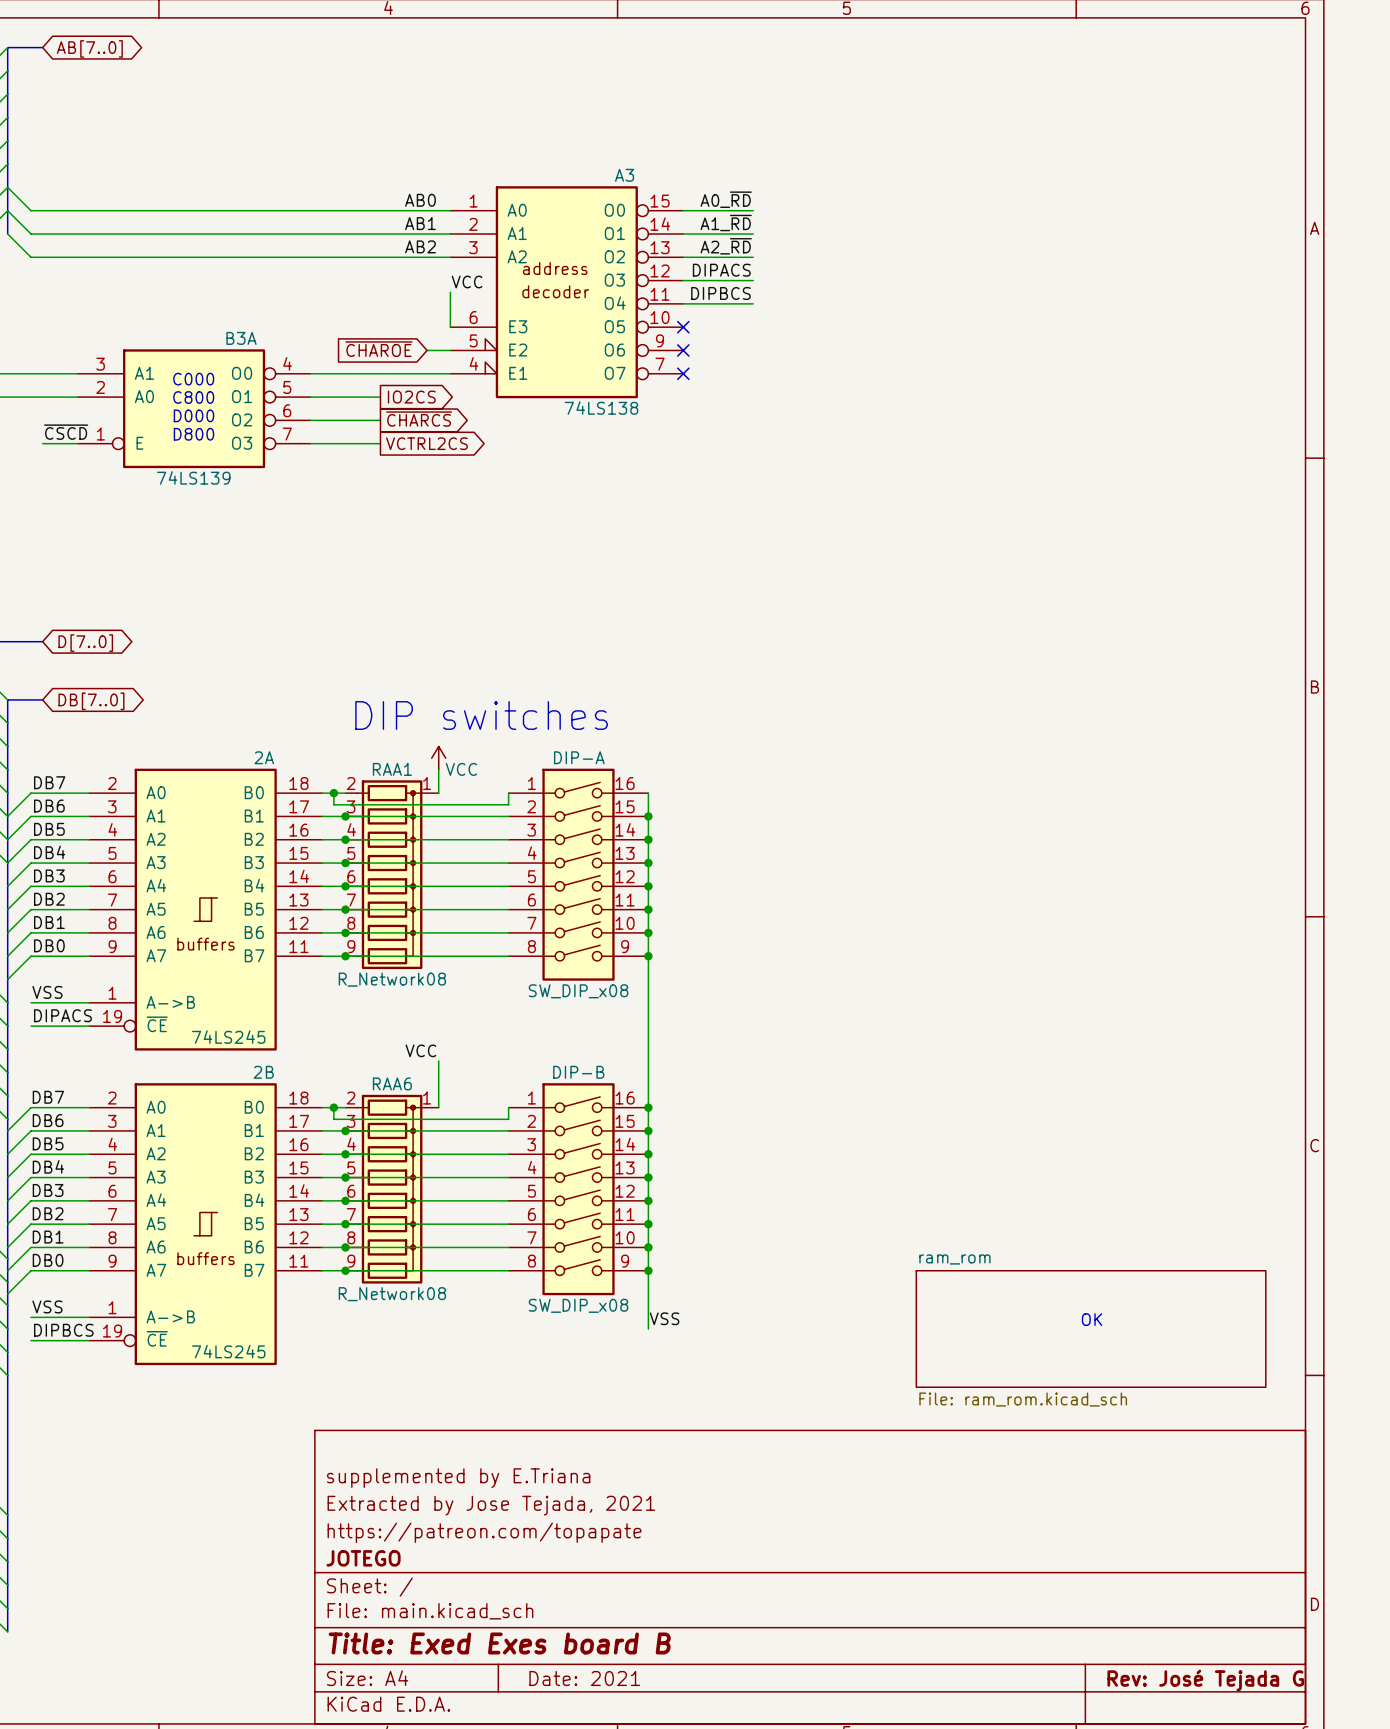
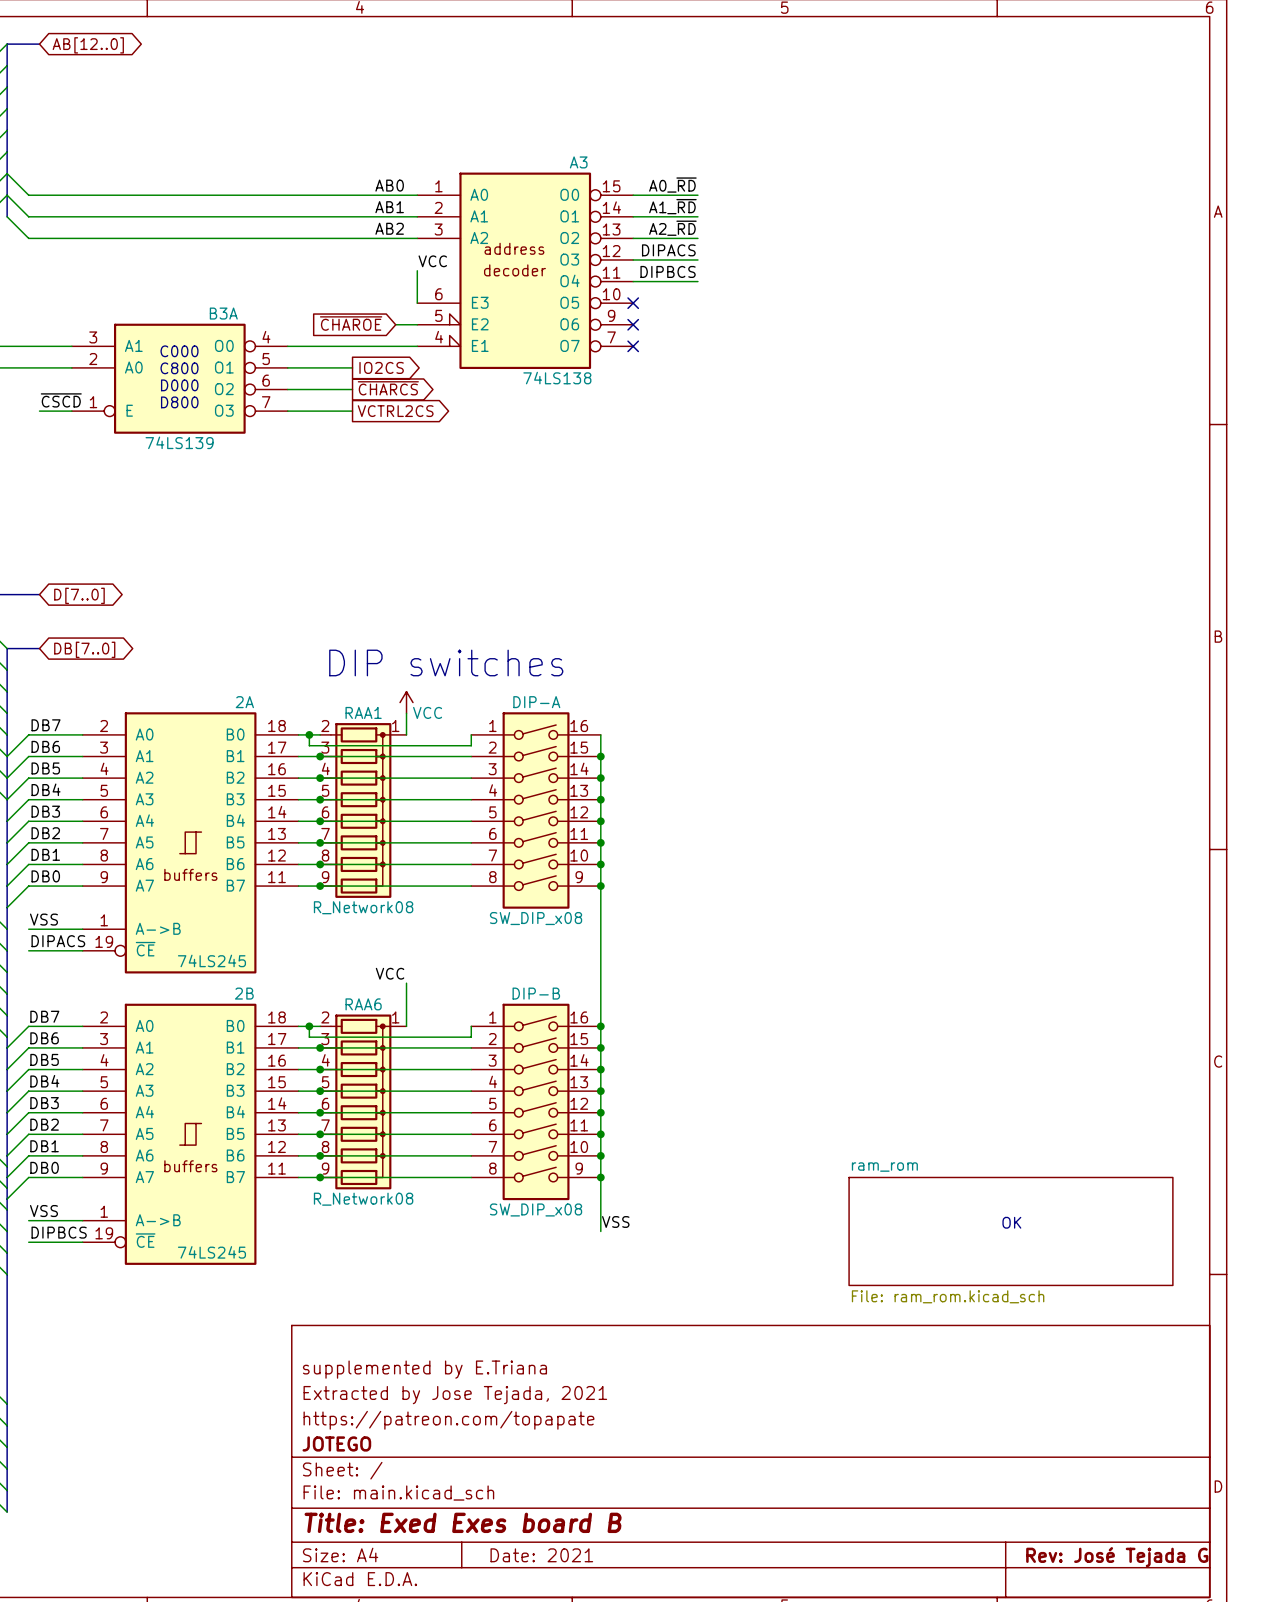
global label: AB[7..0] (89, 48) -> AB[12..0] (88, 45)

